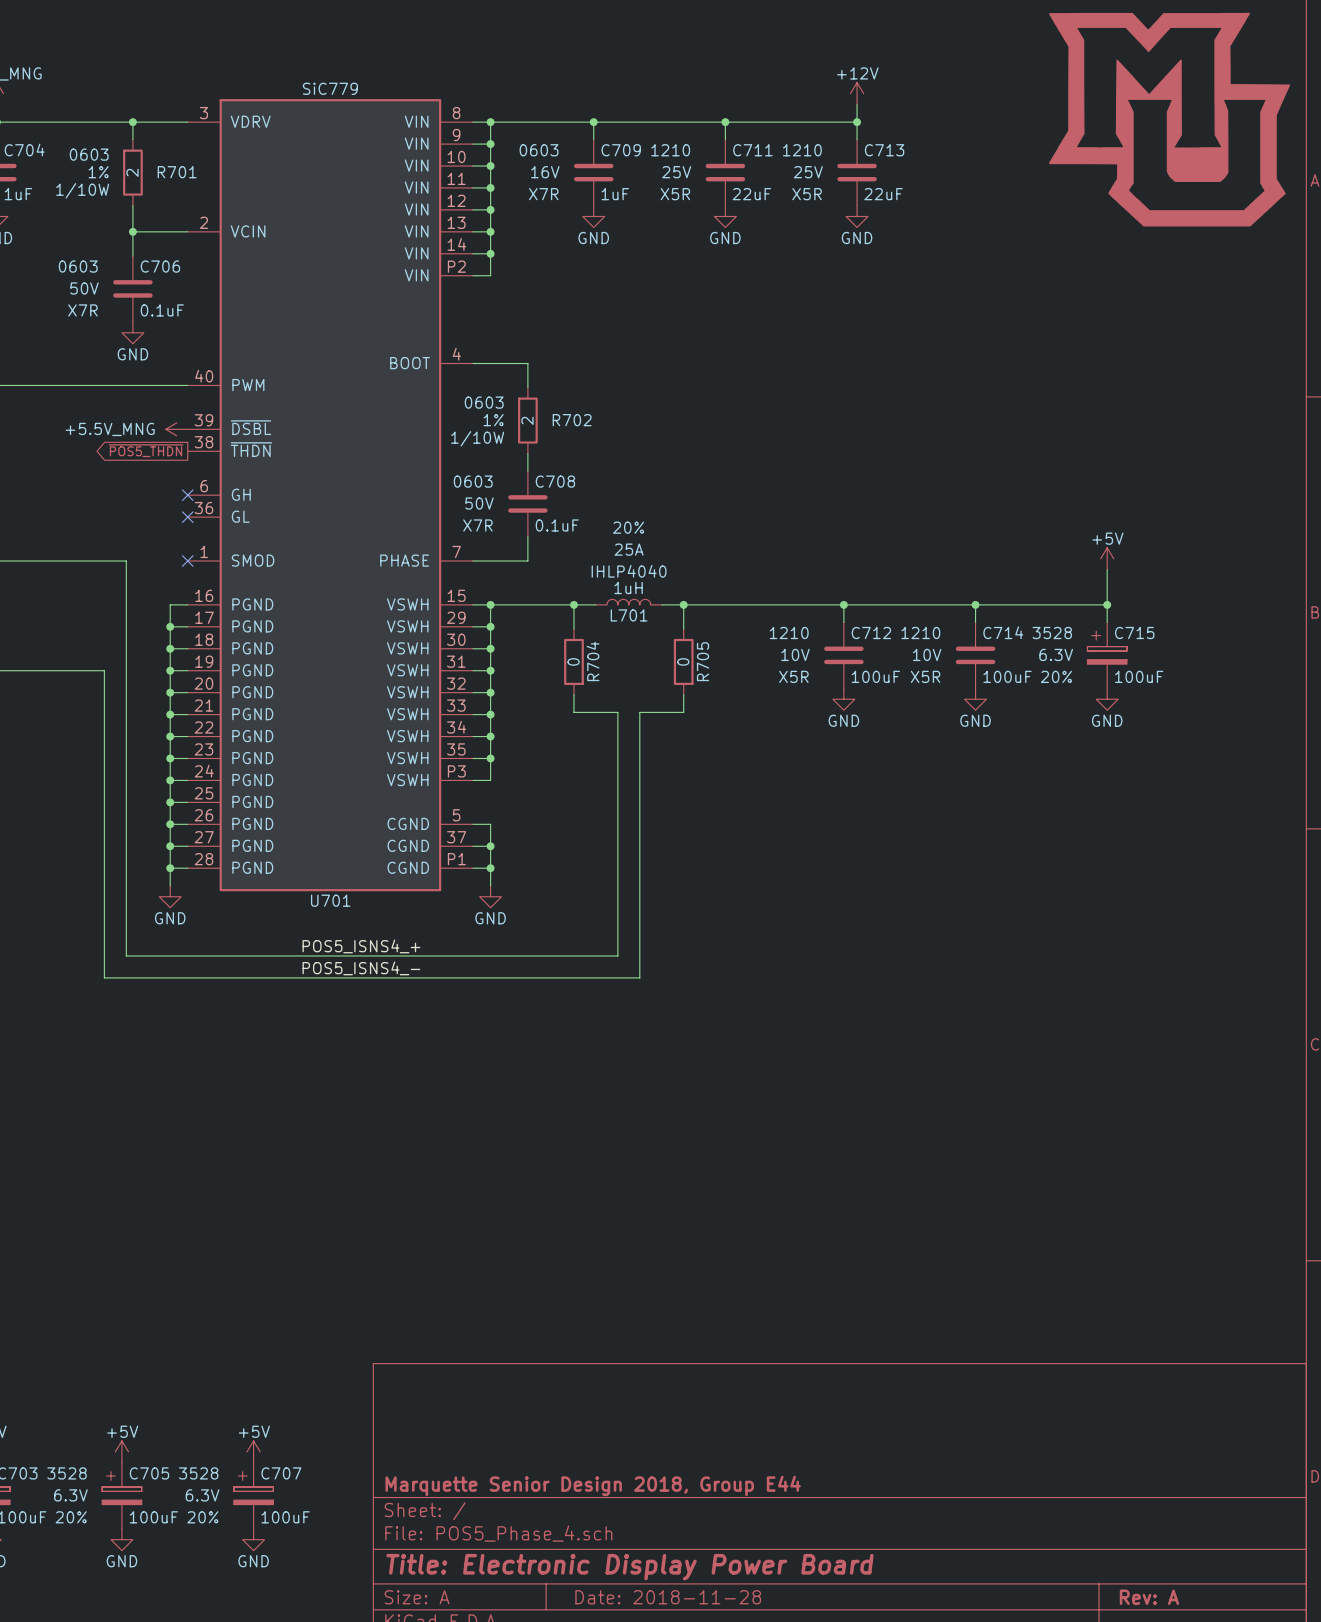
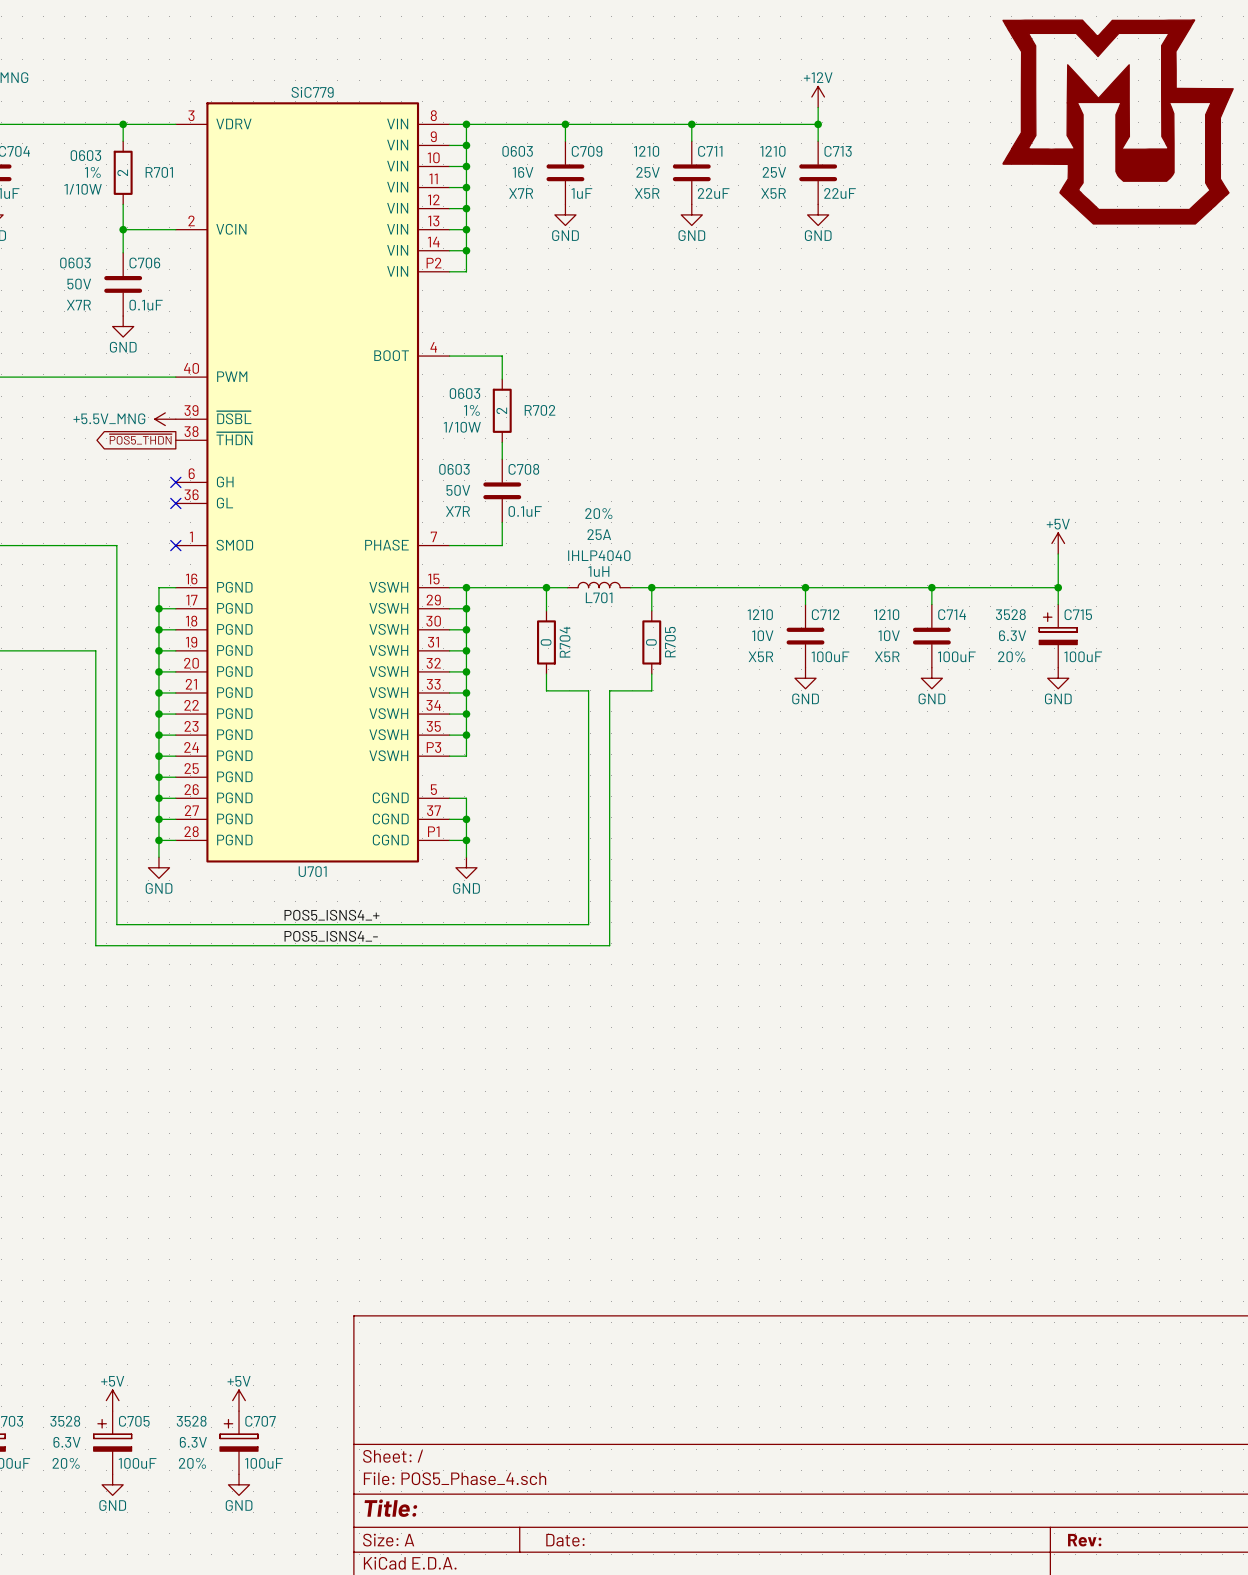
title block: Marquette Senior Design 2018, Group E44 (593, 1485) -> none
title block: Title: Electronic Display Power Board (629, 1567) -> Title: (390, 1508)
title block: Date: 2018-11-28 (668, 1597) -> Date: (565, 1540)
title block: Rev: A (1149, 1597) -> Rev: (1084, 1540)

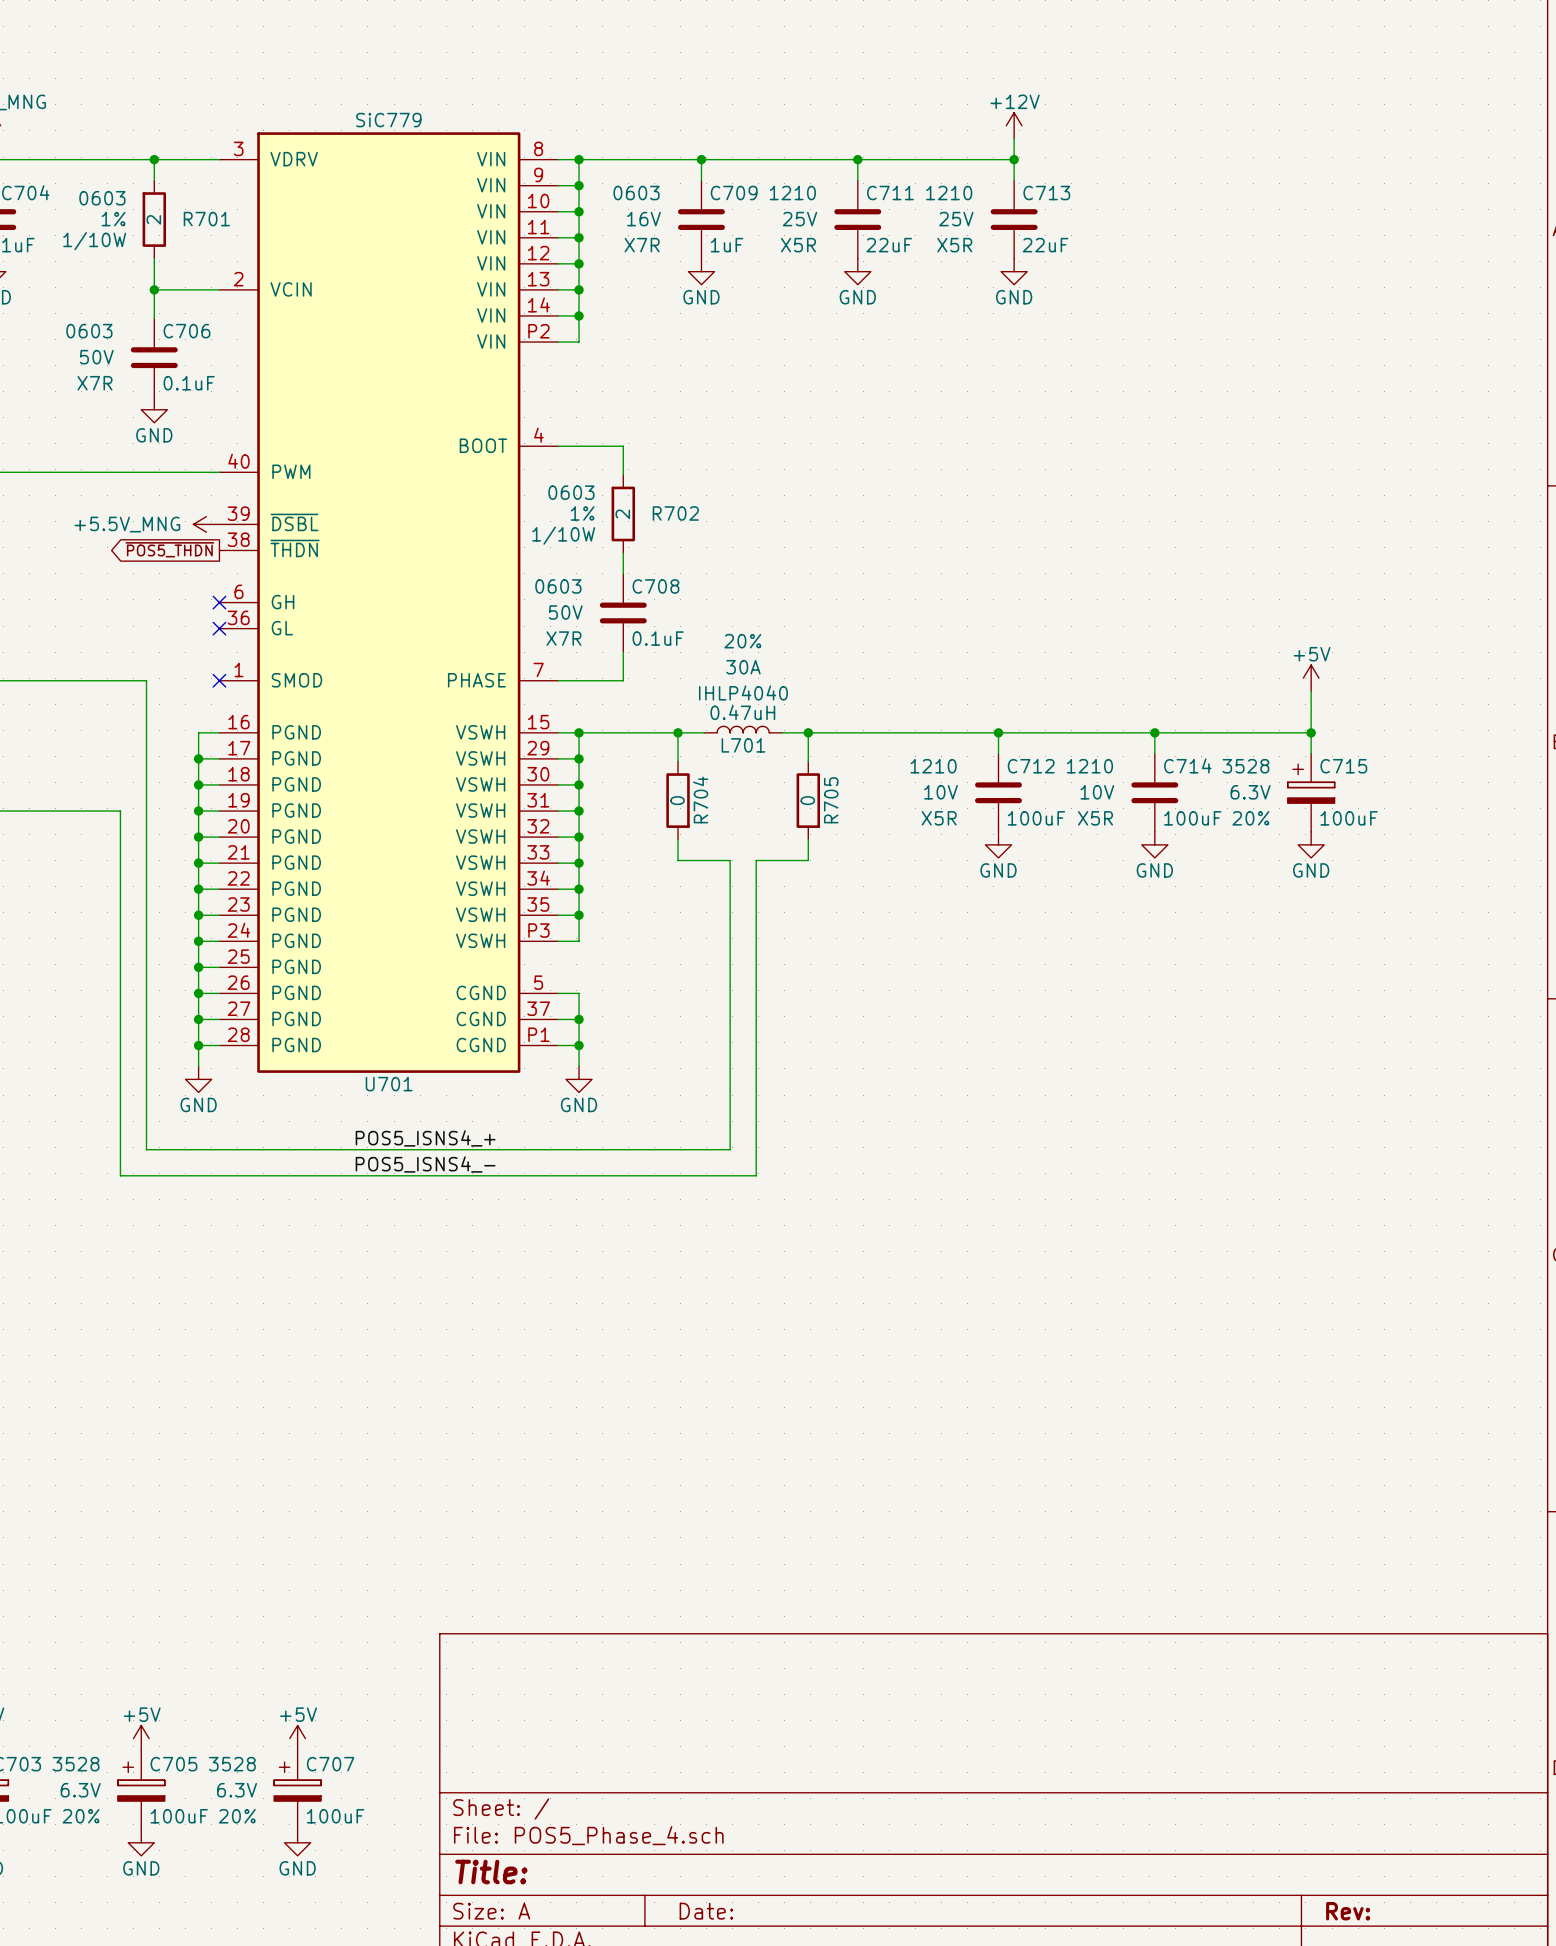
power symbol: (1118, 121) -> none
L701 text: 25A (599, 534) -> 30A (743, 667)
L701 value: 1uH (598, 571) -> 0.47uH (742, 712)

